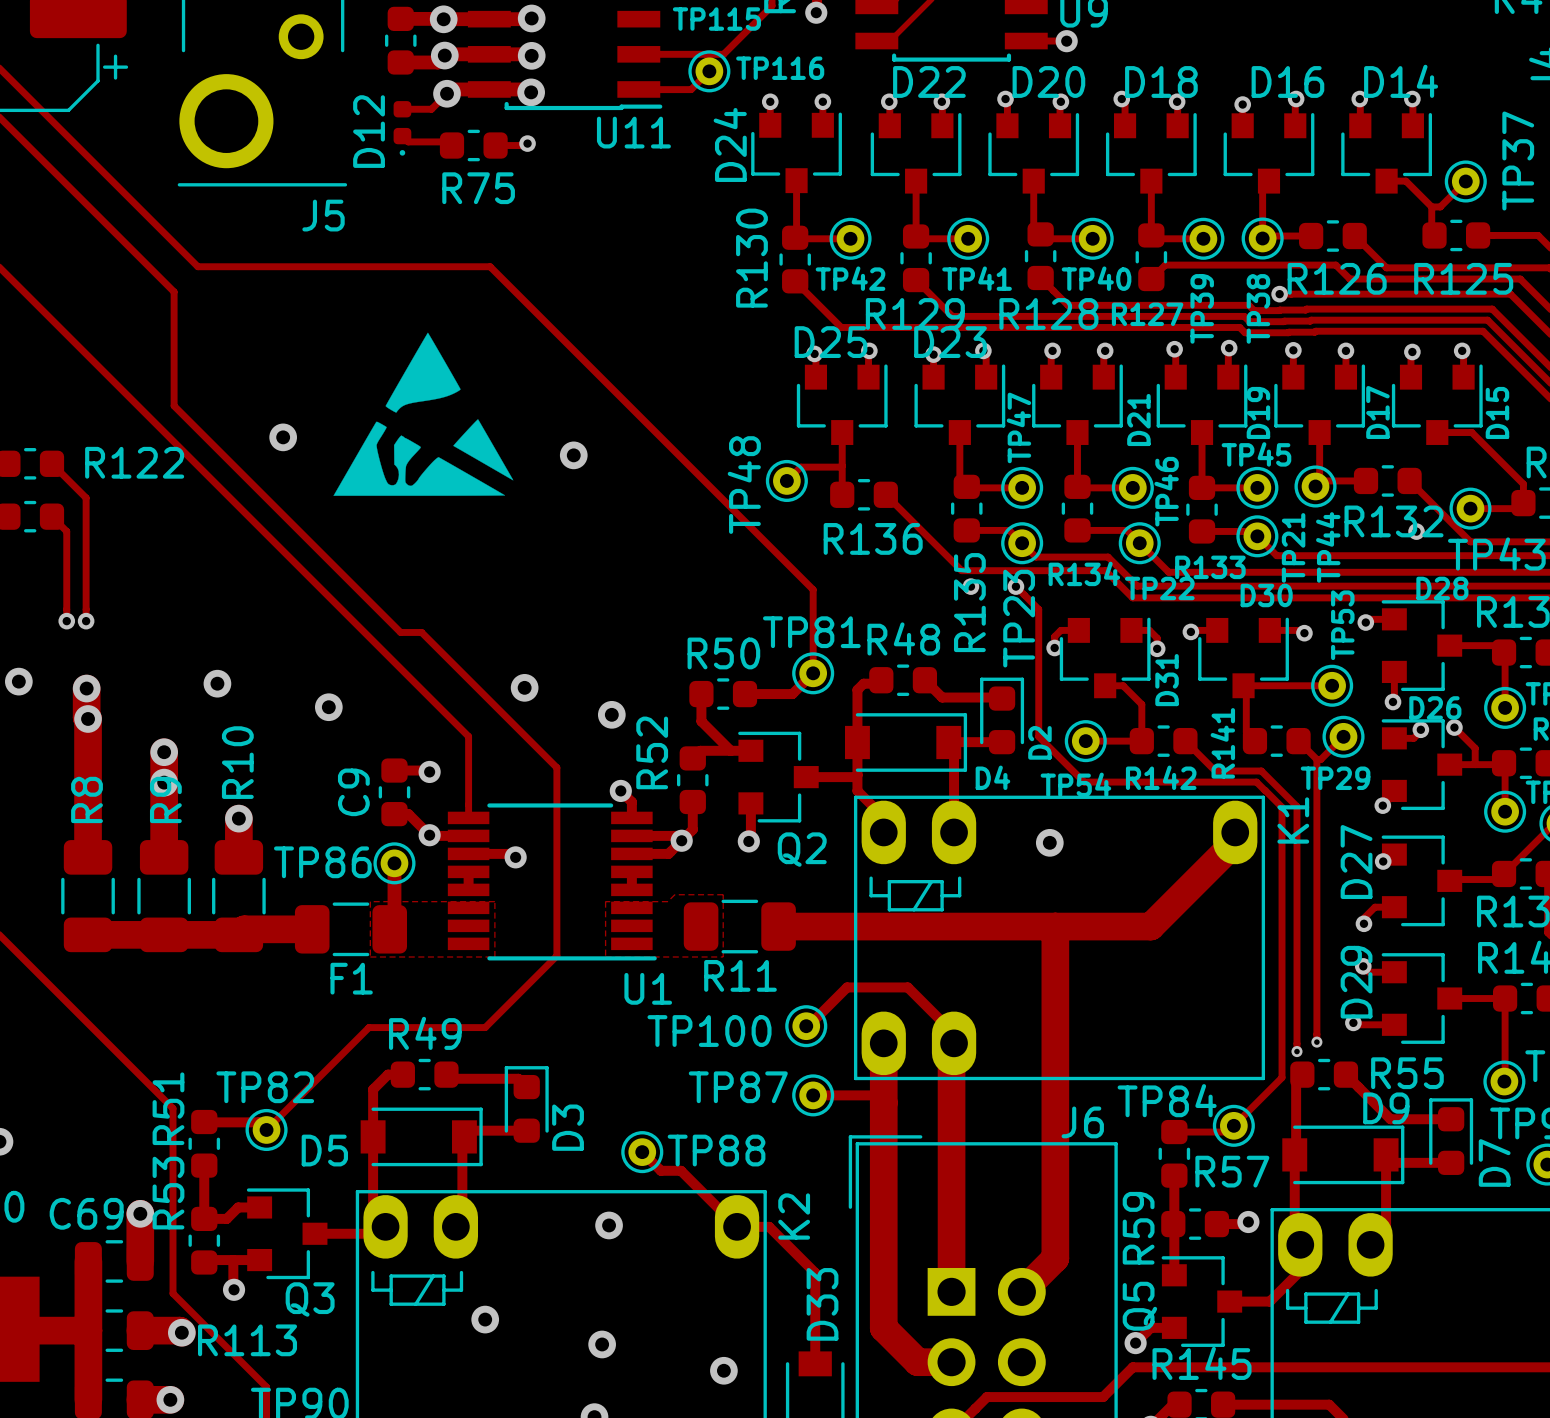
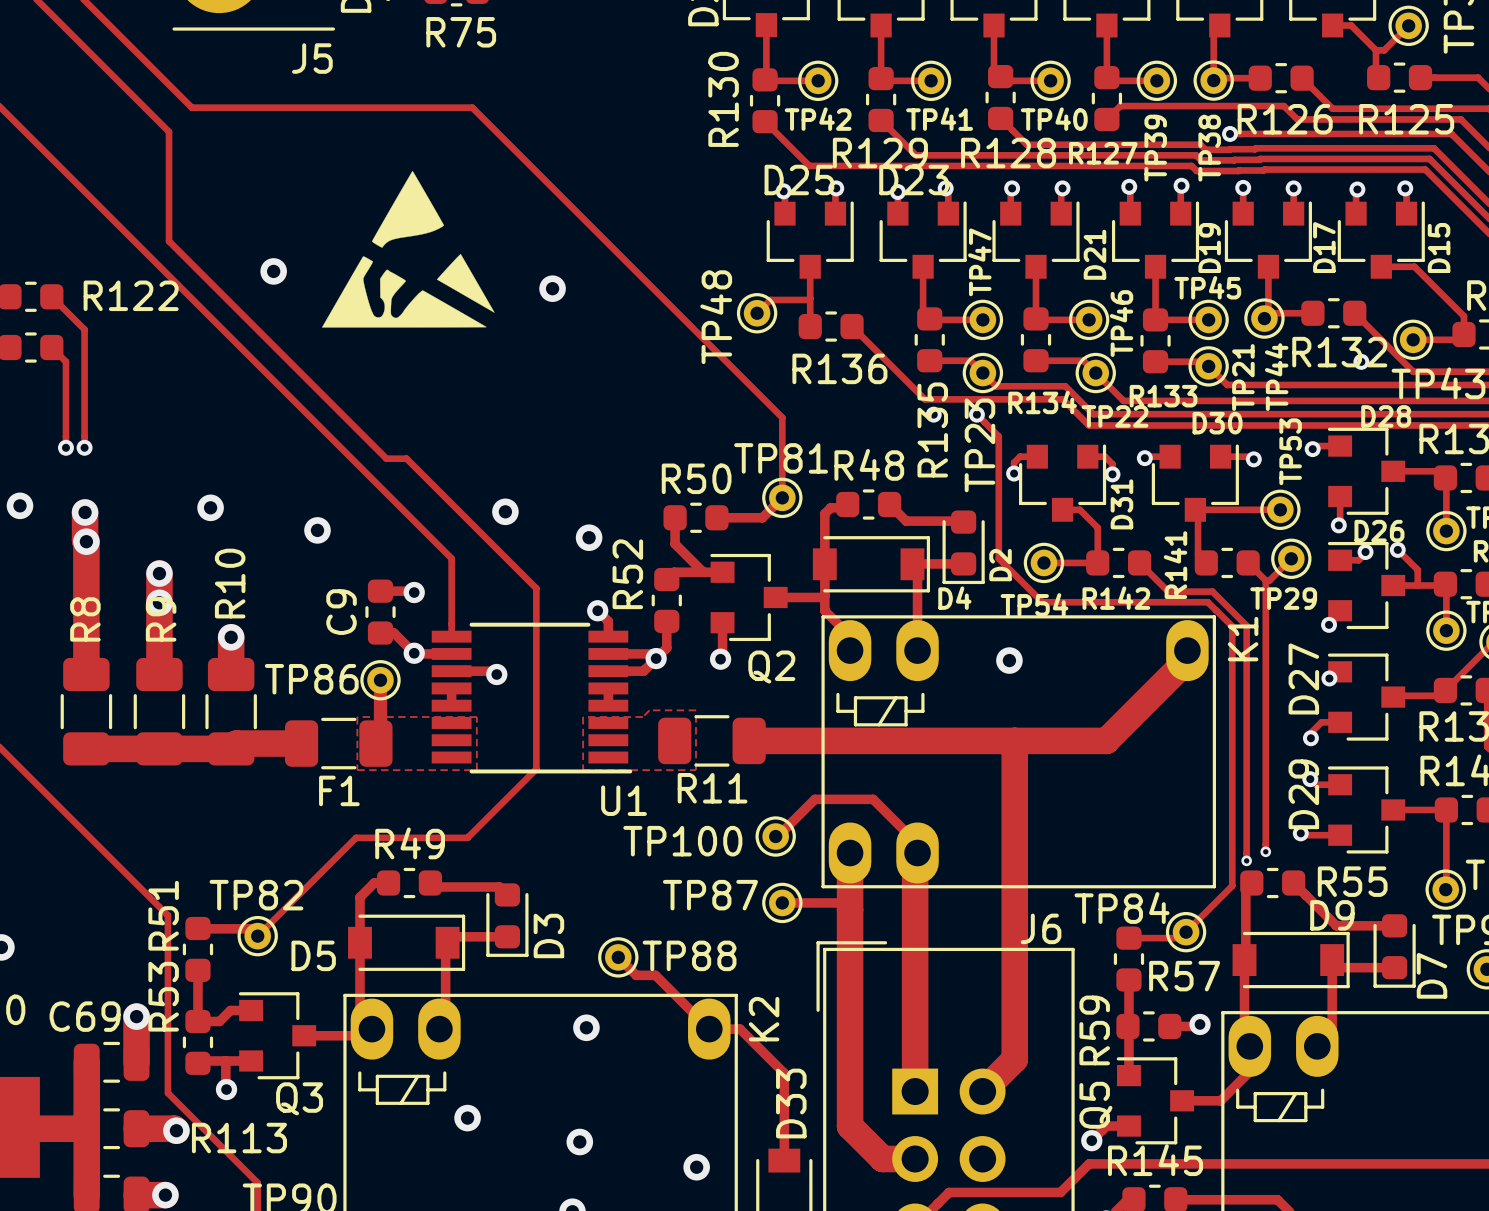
D2 rotation: 0° (1002, 715) -> 180° (963, 547)
D3 rotation: 0° (526, 1104) -> 180° (507, 920)
D7 rotation: 0° (1451, 1136) -> 180° (1394, 951)

